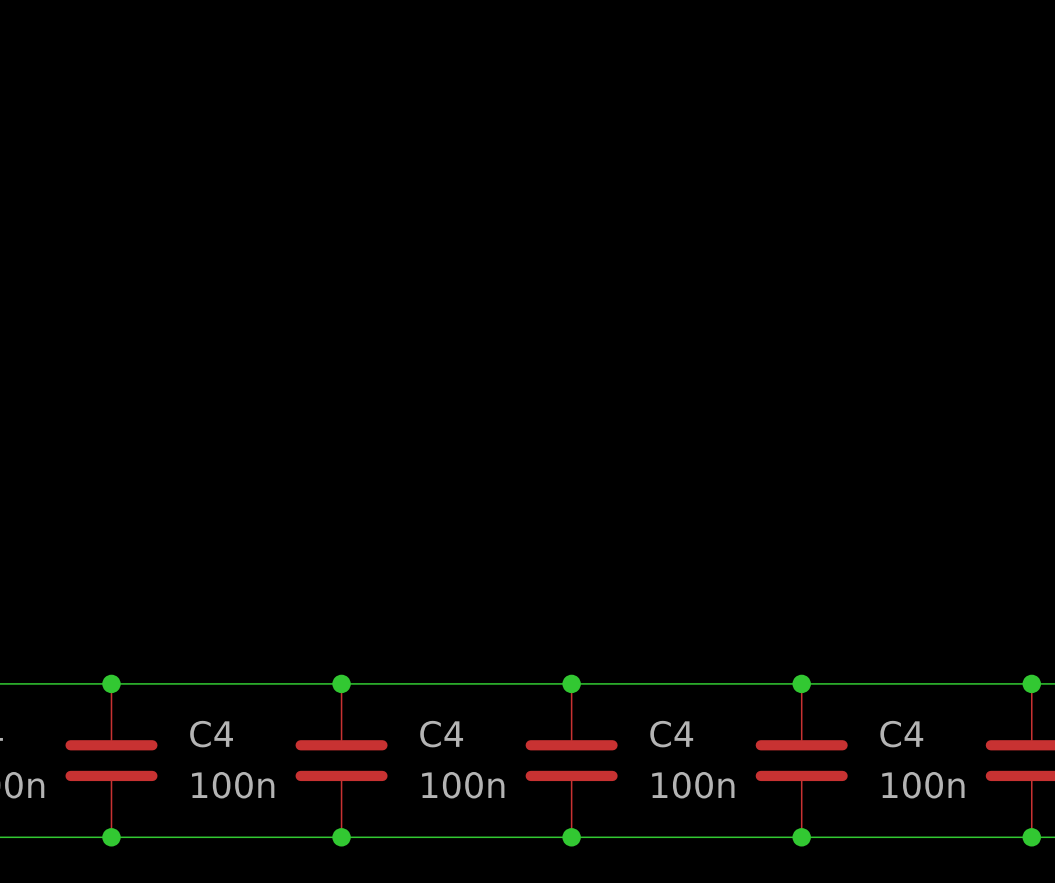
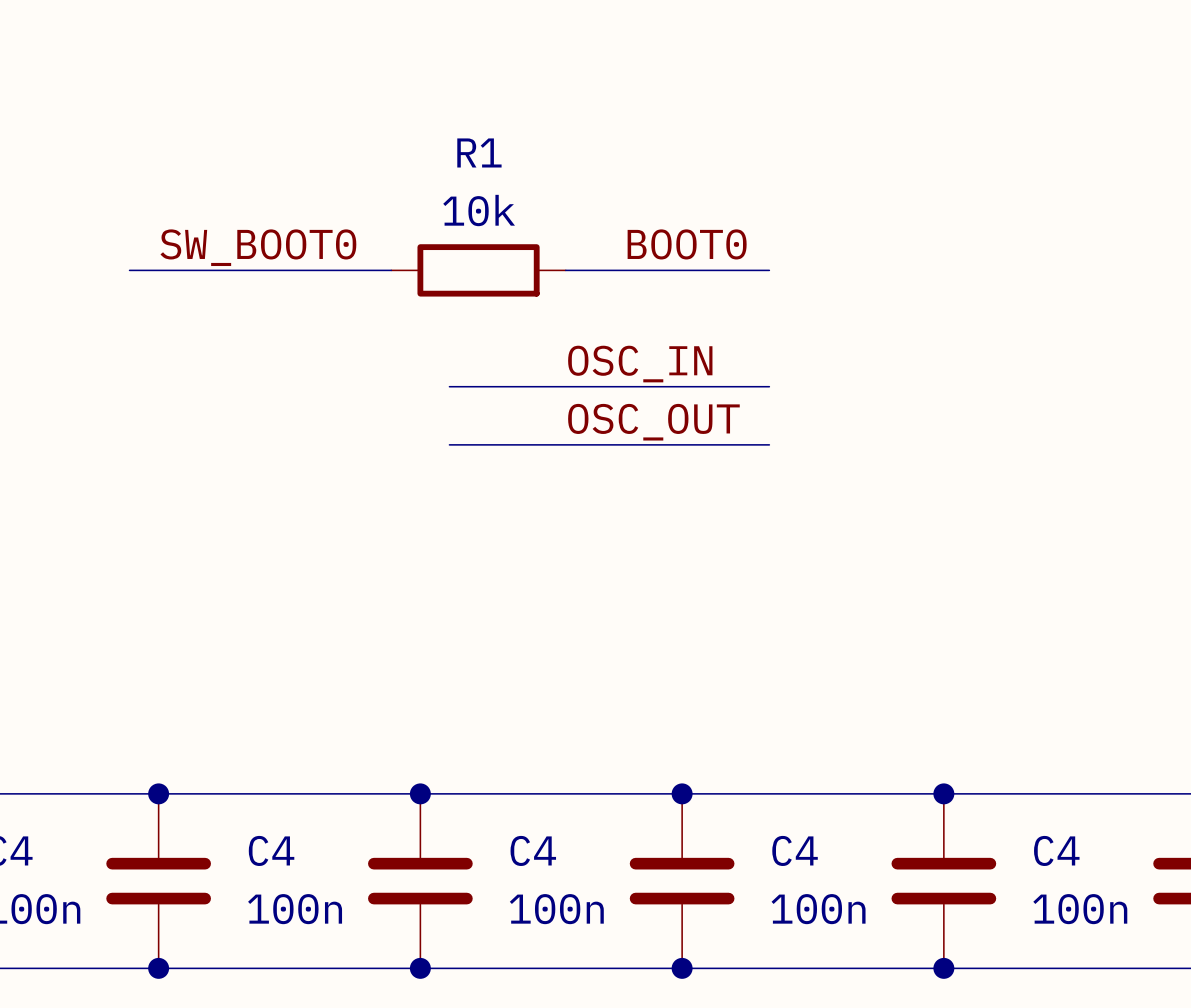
label: none -> BOOT0 (687, 244)
label: none -> SW_BOOT0 (258, 247)
wire: none -> (129, 270) (391, 270)
R1: none -> 10k (478, 270)
wire: none -> (565, 270) (769, 270)
label: none -> OSC_IN (640, 364)
wire: none -> (449, 386) (769, 386)
label: none -> OSC_OUT (653, 422)
wire: none -> (449, 444) (769, 444)

